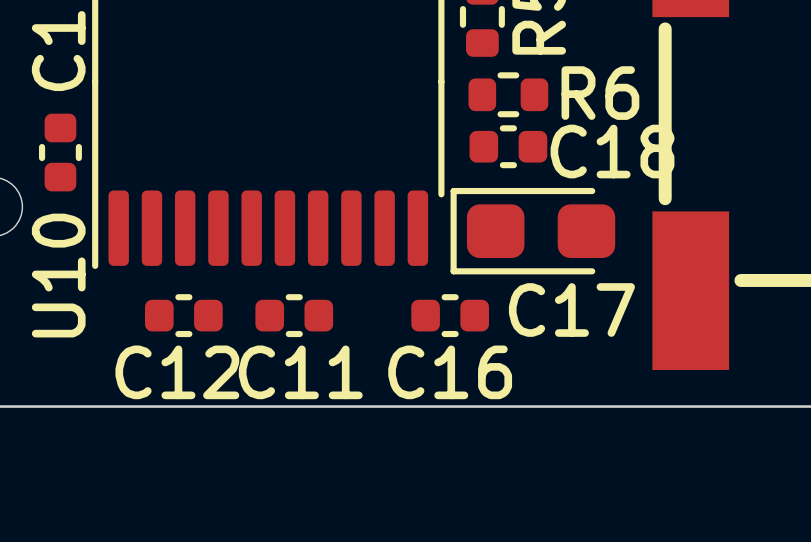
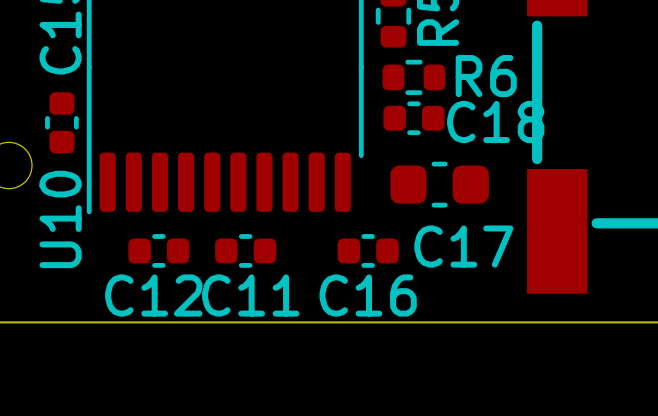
C17 footprint: [450, 187, 616, 275] -> [390, 161, 489, 208]

